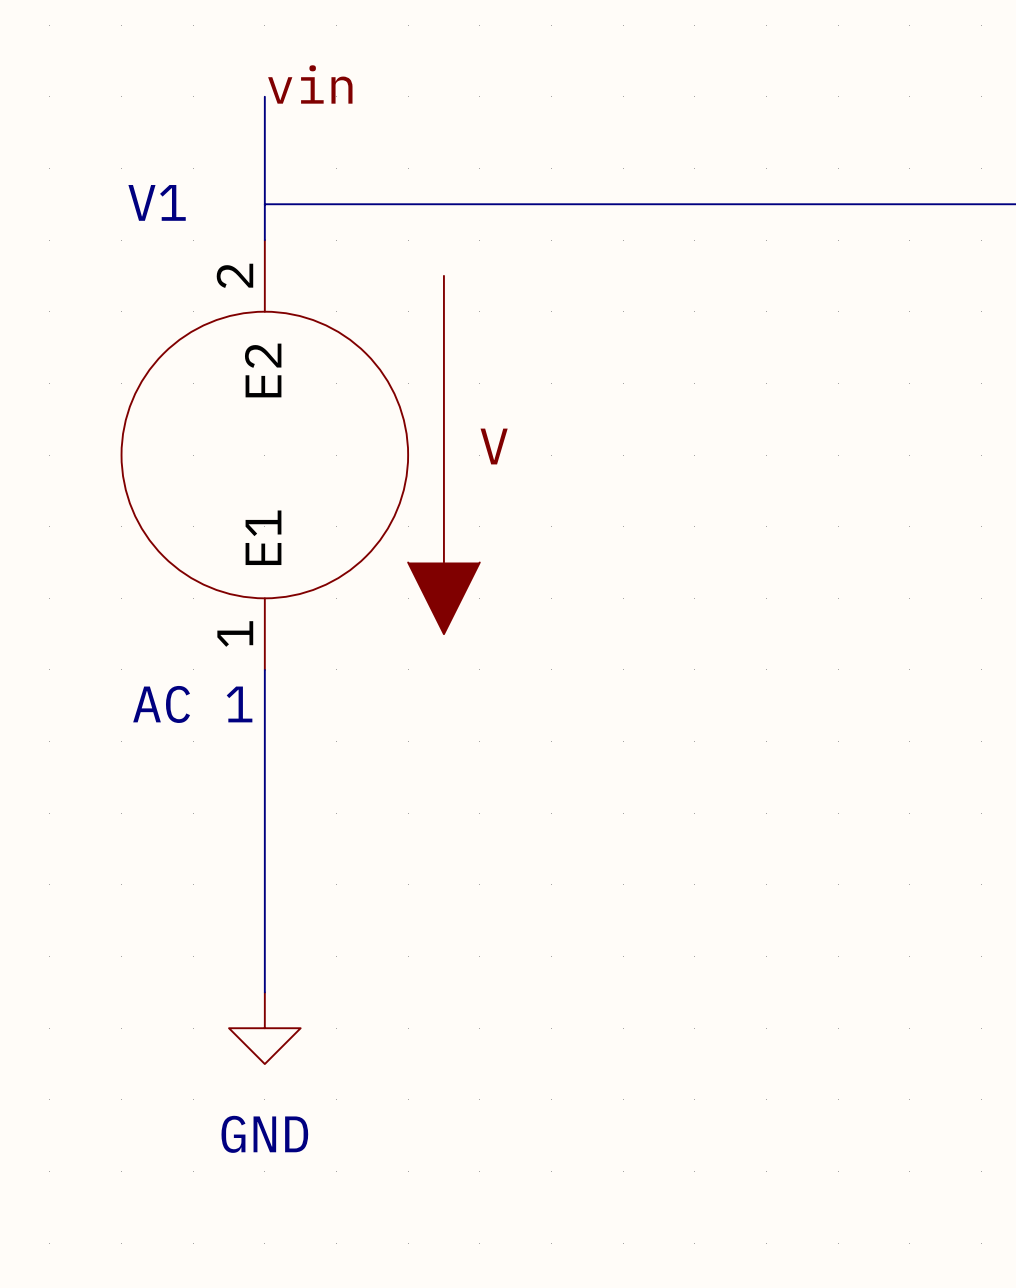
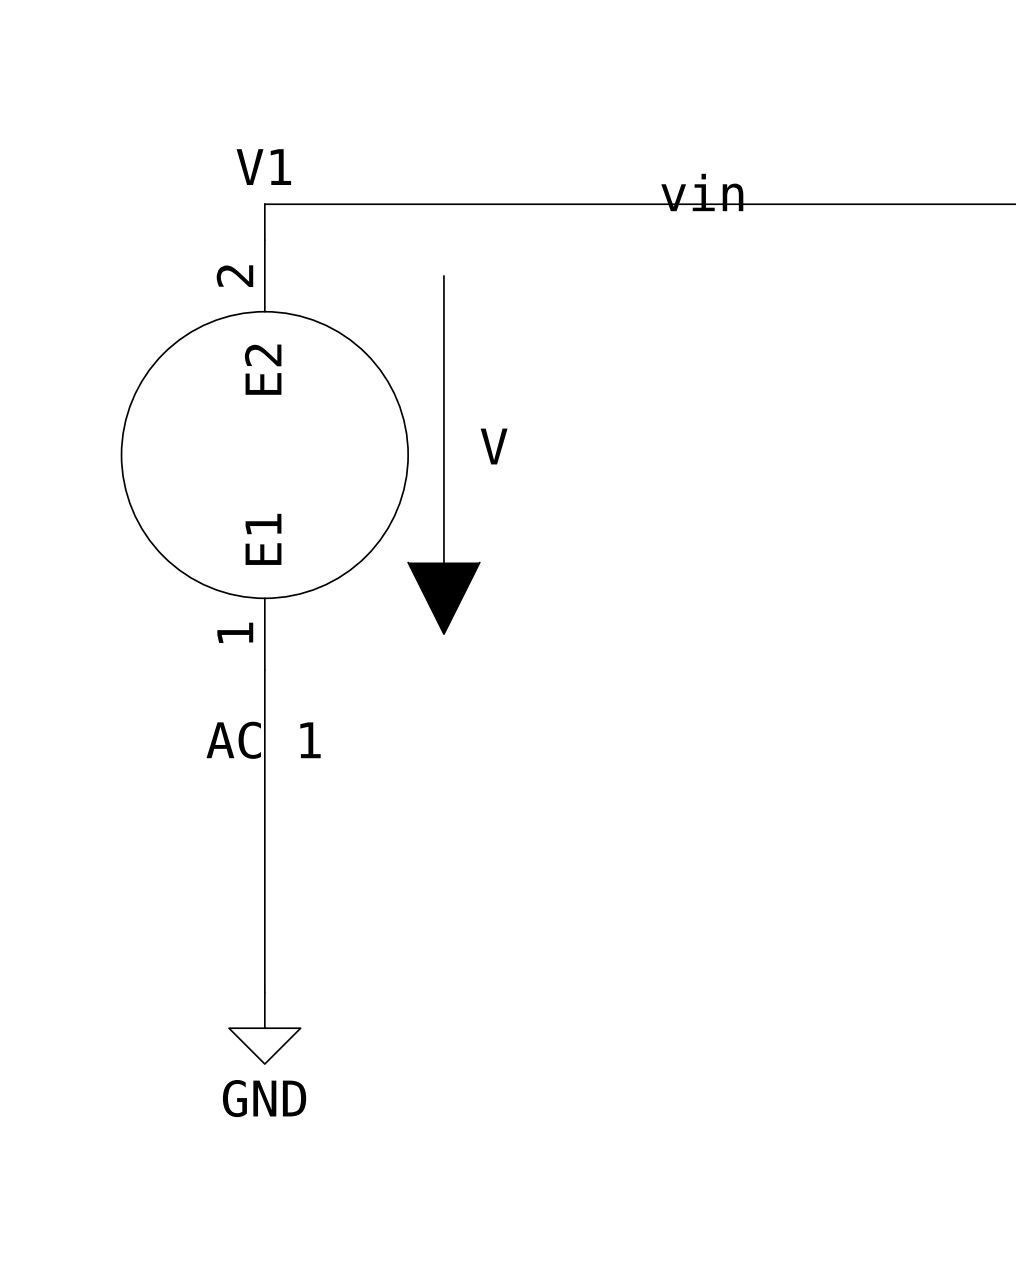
label position: vin (310, 84) -> vin (702, 192)
wire: (264, 96) (264, 204) -> none
V1 name position: V1 (157, 202) -> V1 (263, 167)
V1 value position: AC 1 (192, 704) -> AC 1 (263, 740)
power symbol text position: GND (264, 1134) -> GND (264, 1098)

